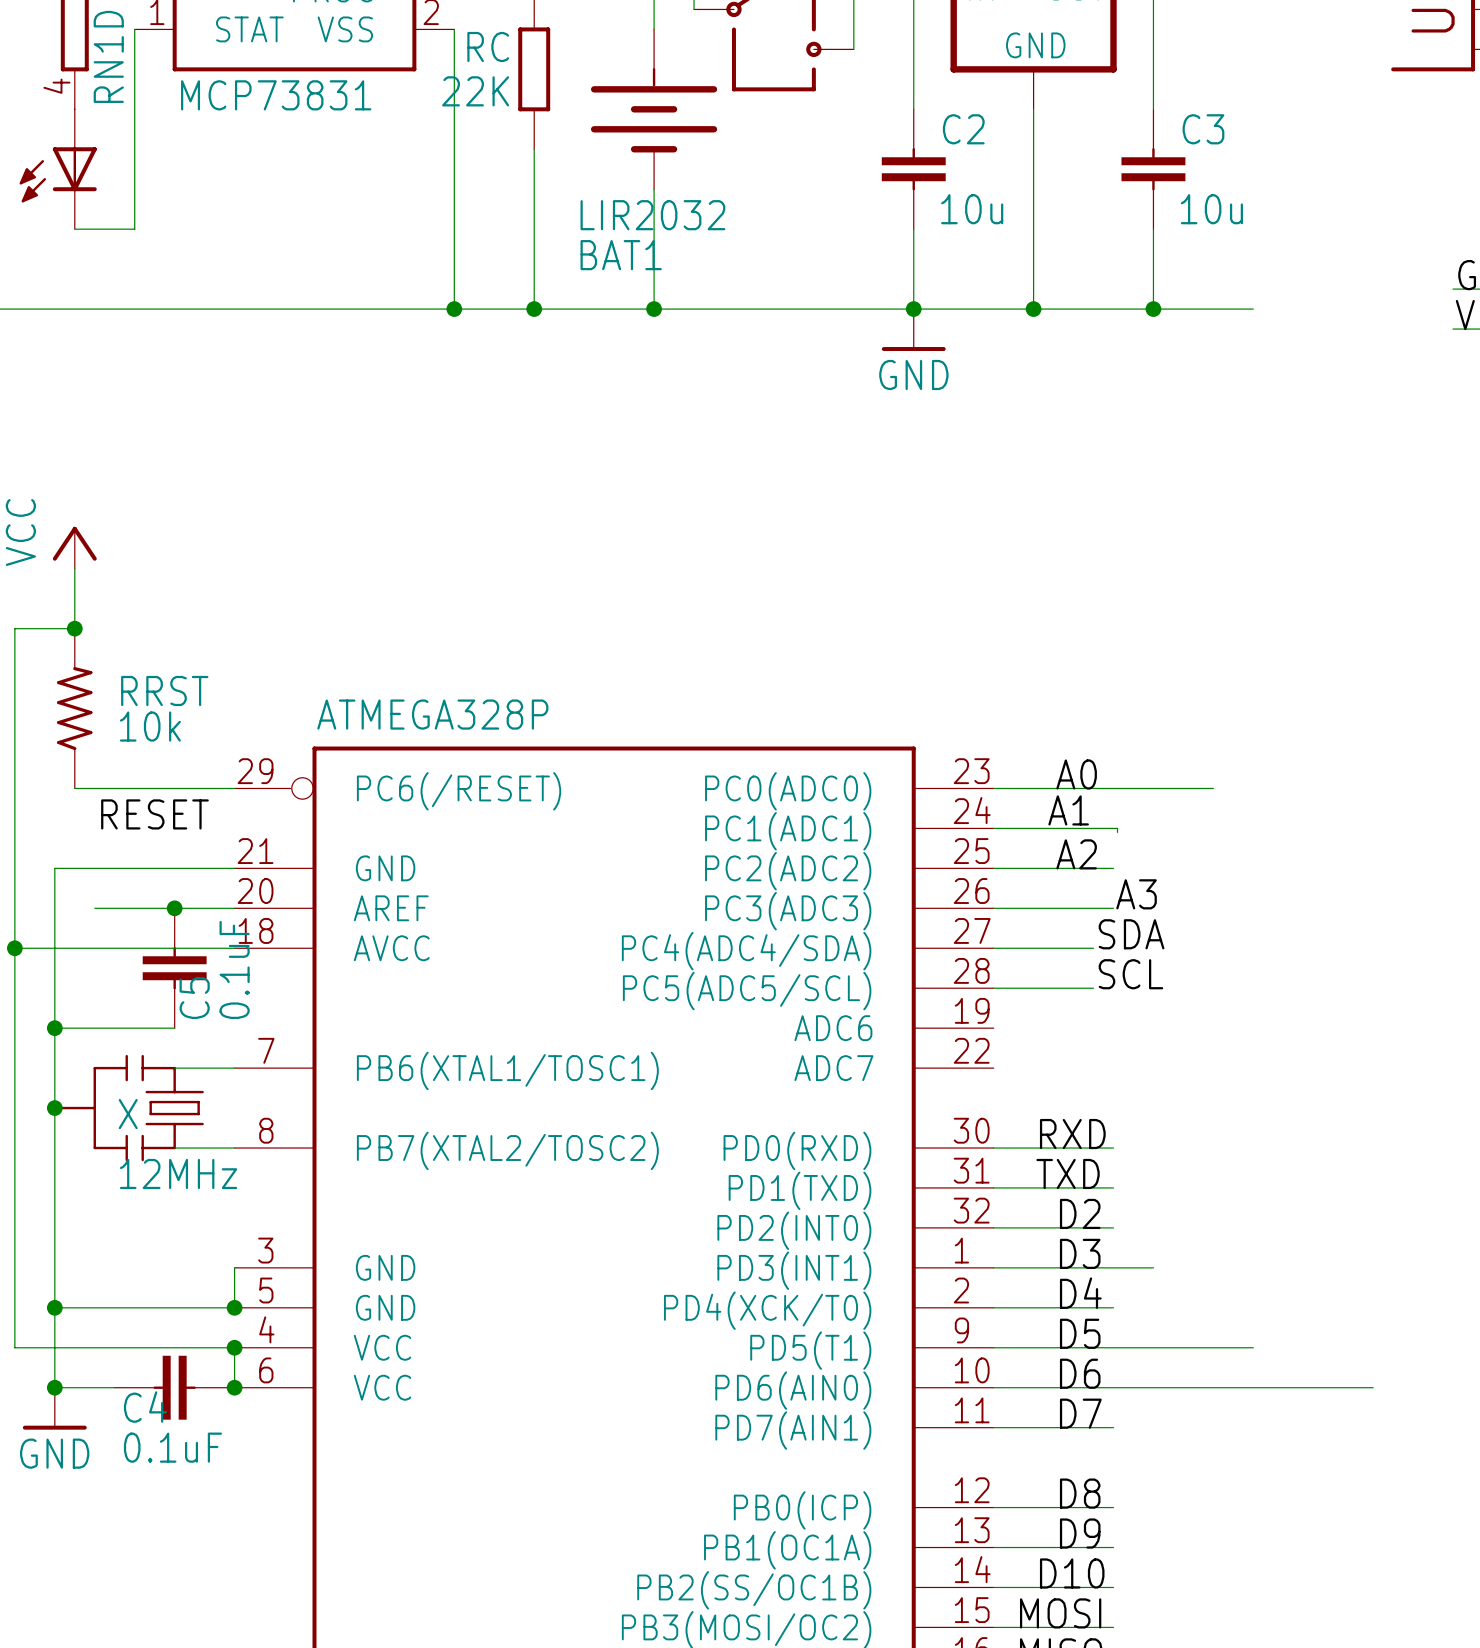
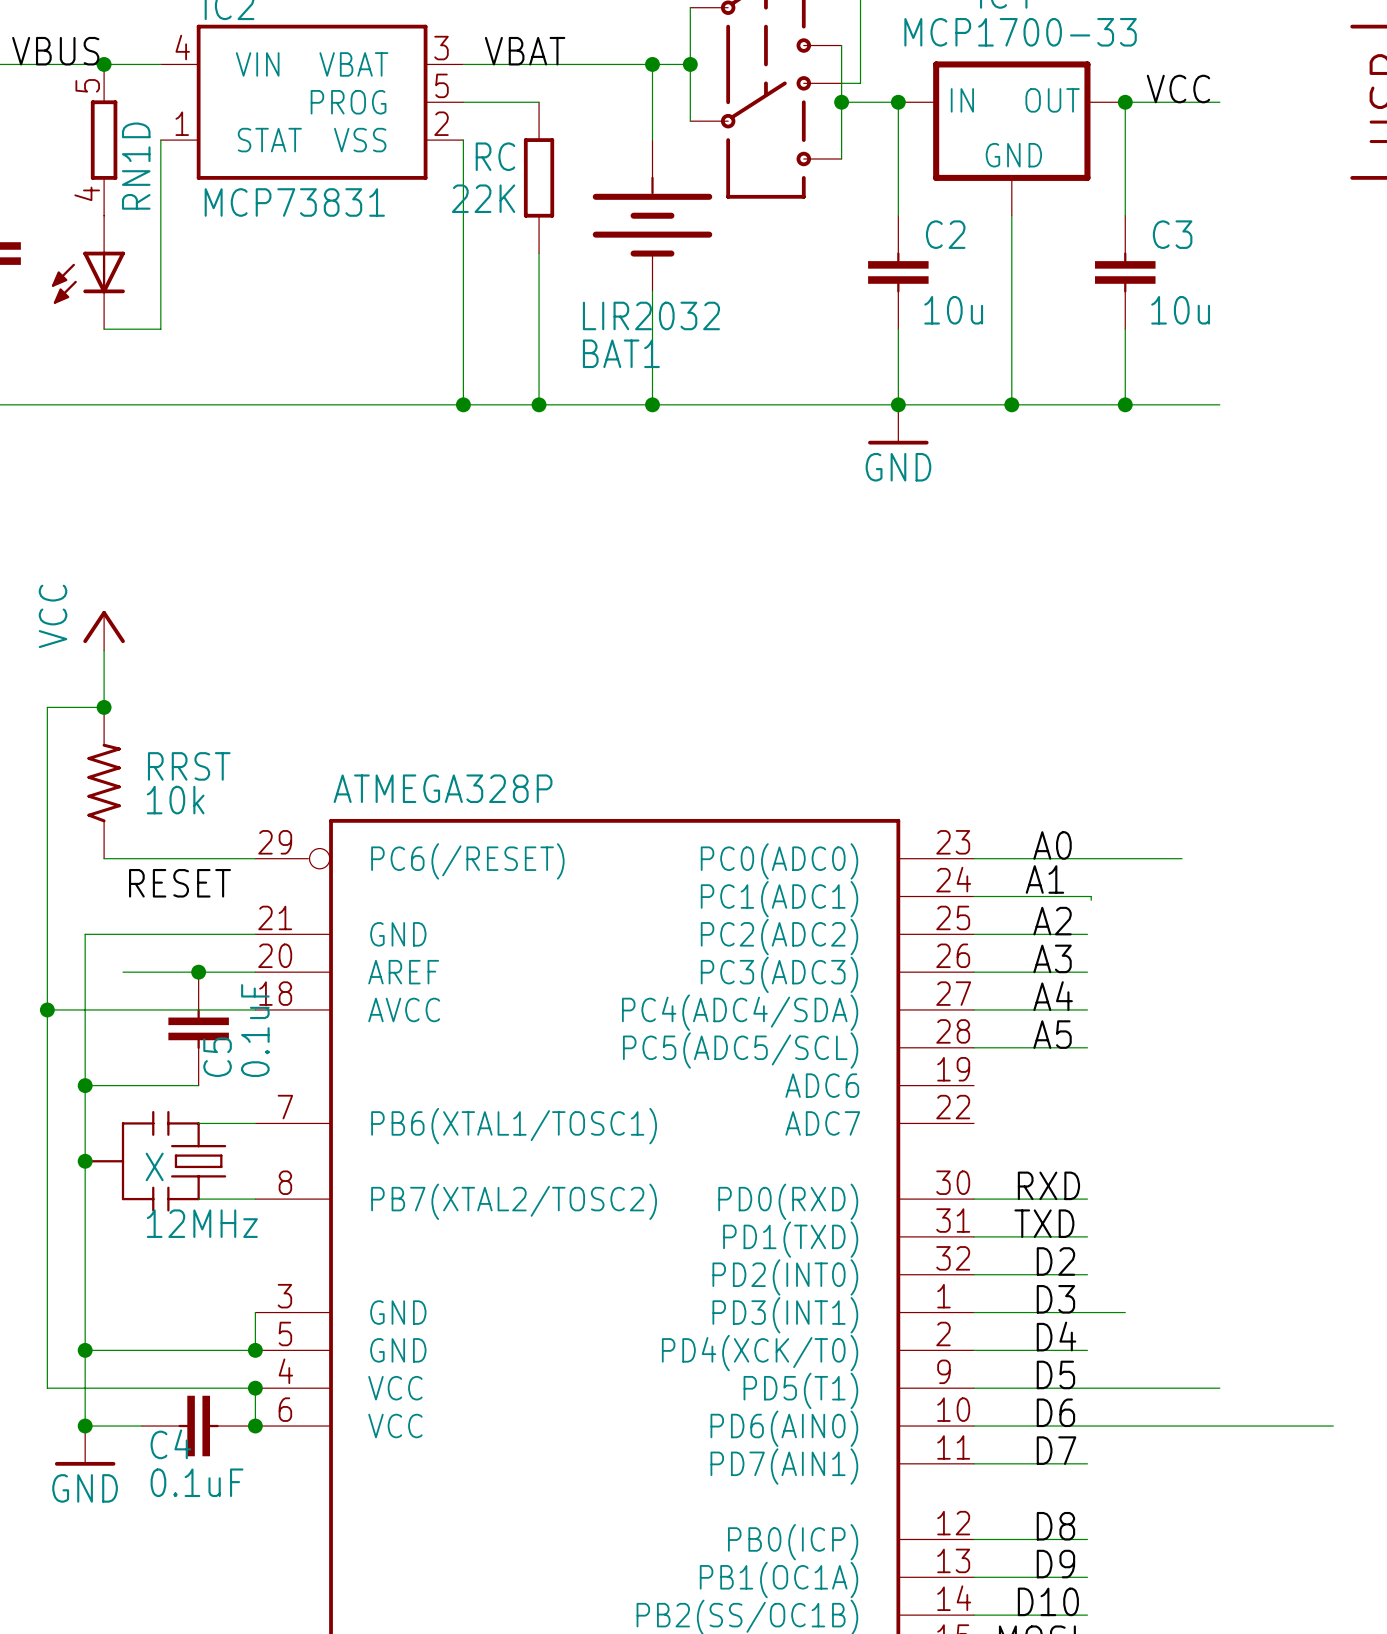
label position: A3 (1136, 894) -> A3 (1052, 958)
label: none -> A4 (1053, 996)
label: SDA (1131, 934) -> none
label: none -> A5 (1052, 1034)
label: SCL (1130, 974) -> none

